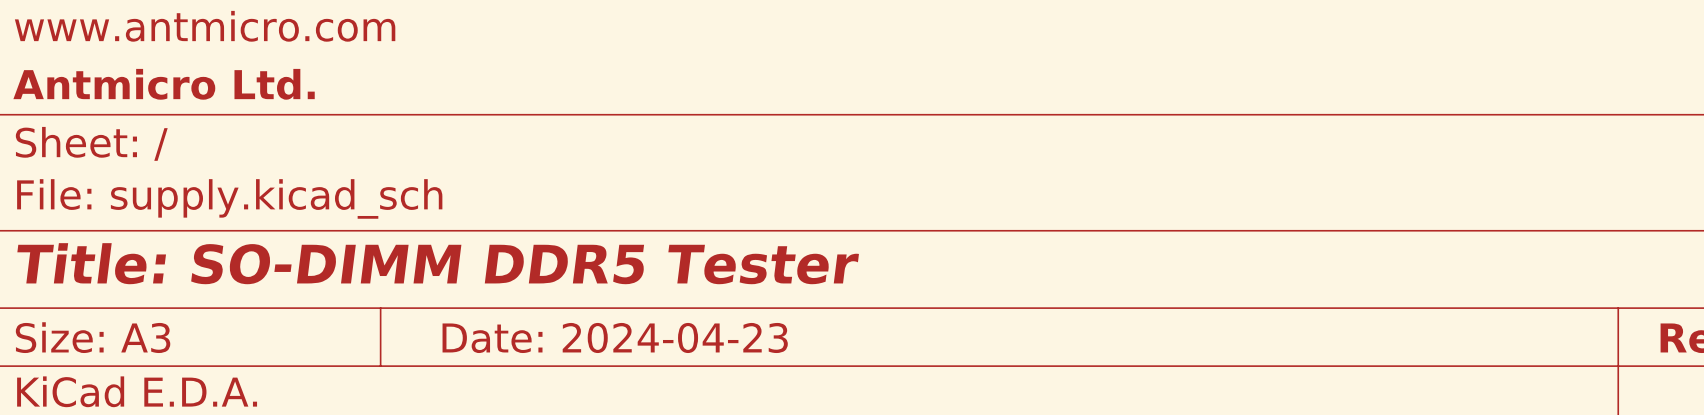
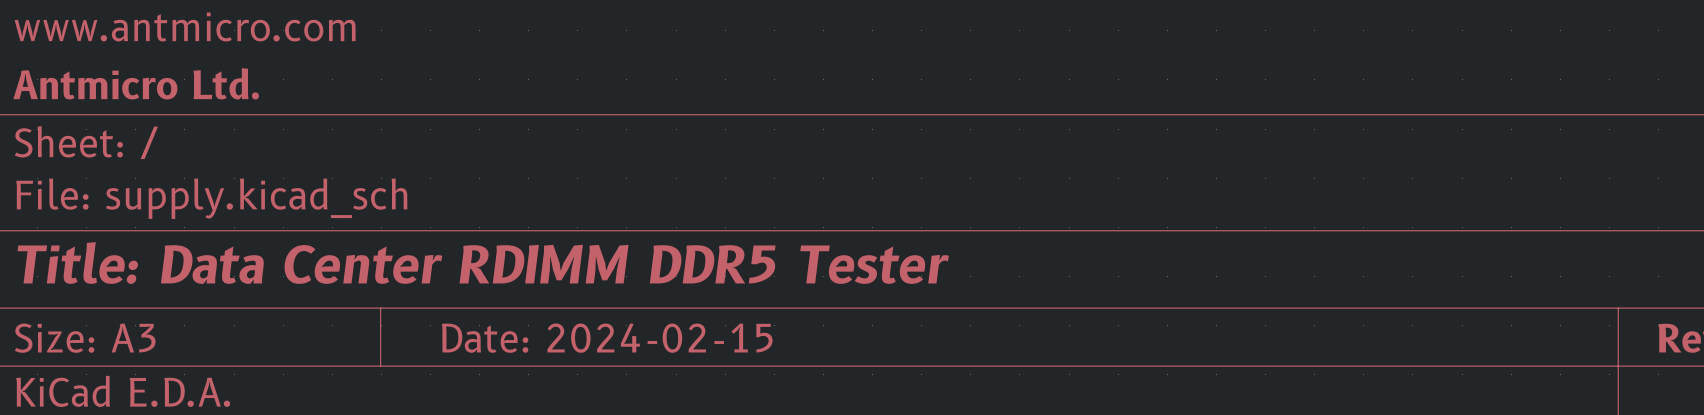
title block: Title: SO-DIMM DDR5 Tester (438, 263) -> Title: Data Center RDIMM DDR5 Tester (483, 263)
title block: Date: 2024-04-23 (615, 337) -> Date: 2024-02-15 (607, 338)

